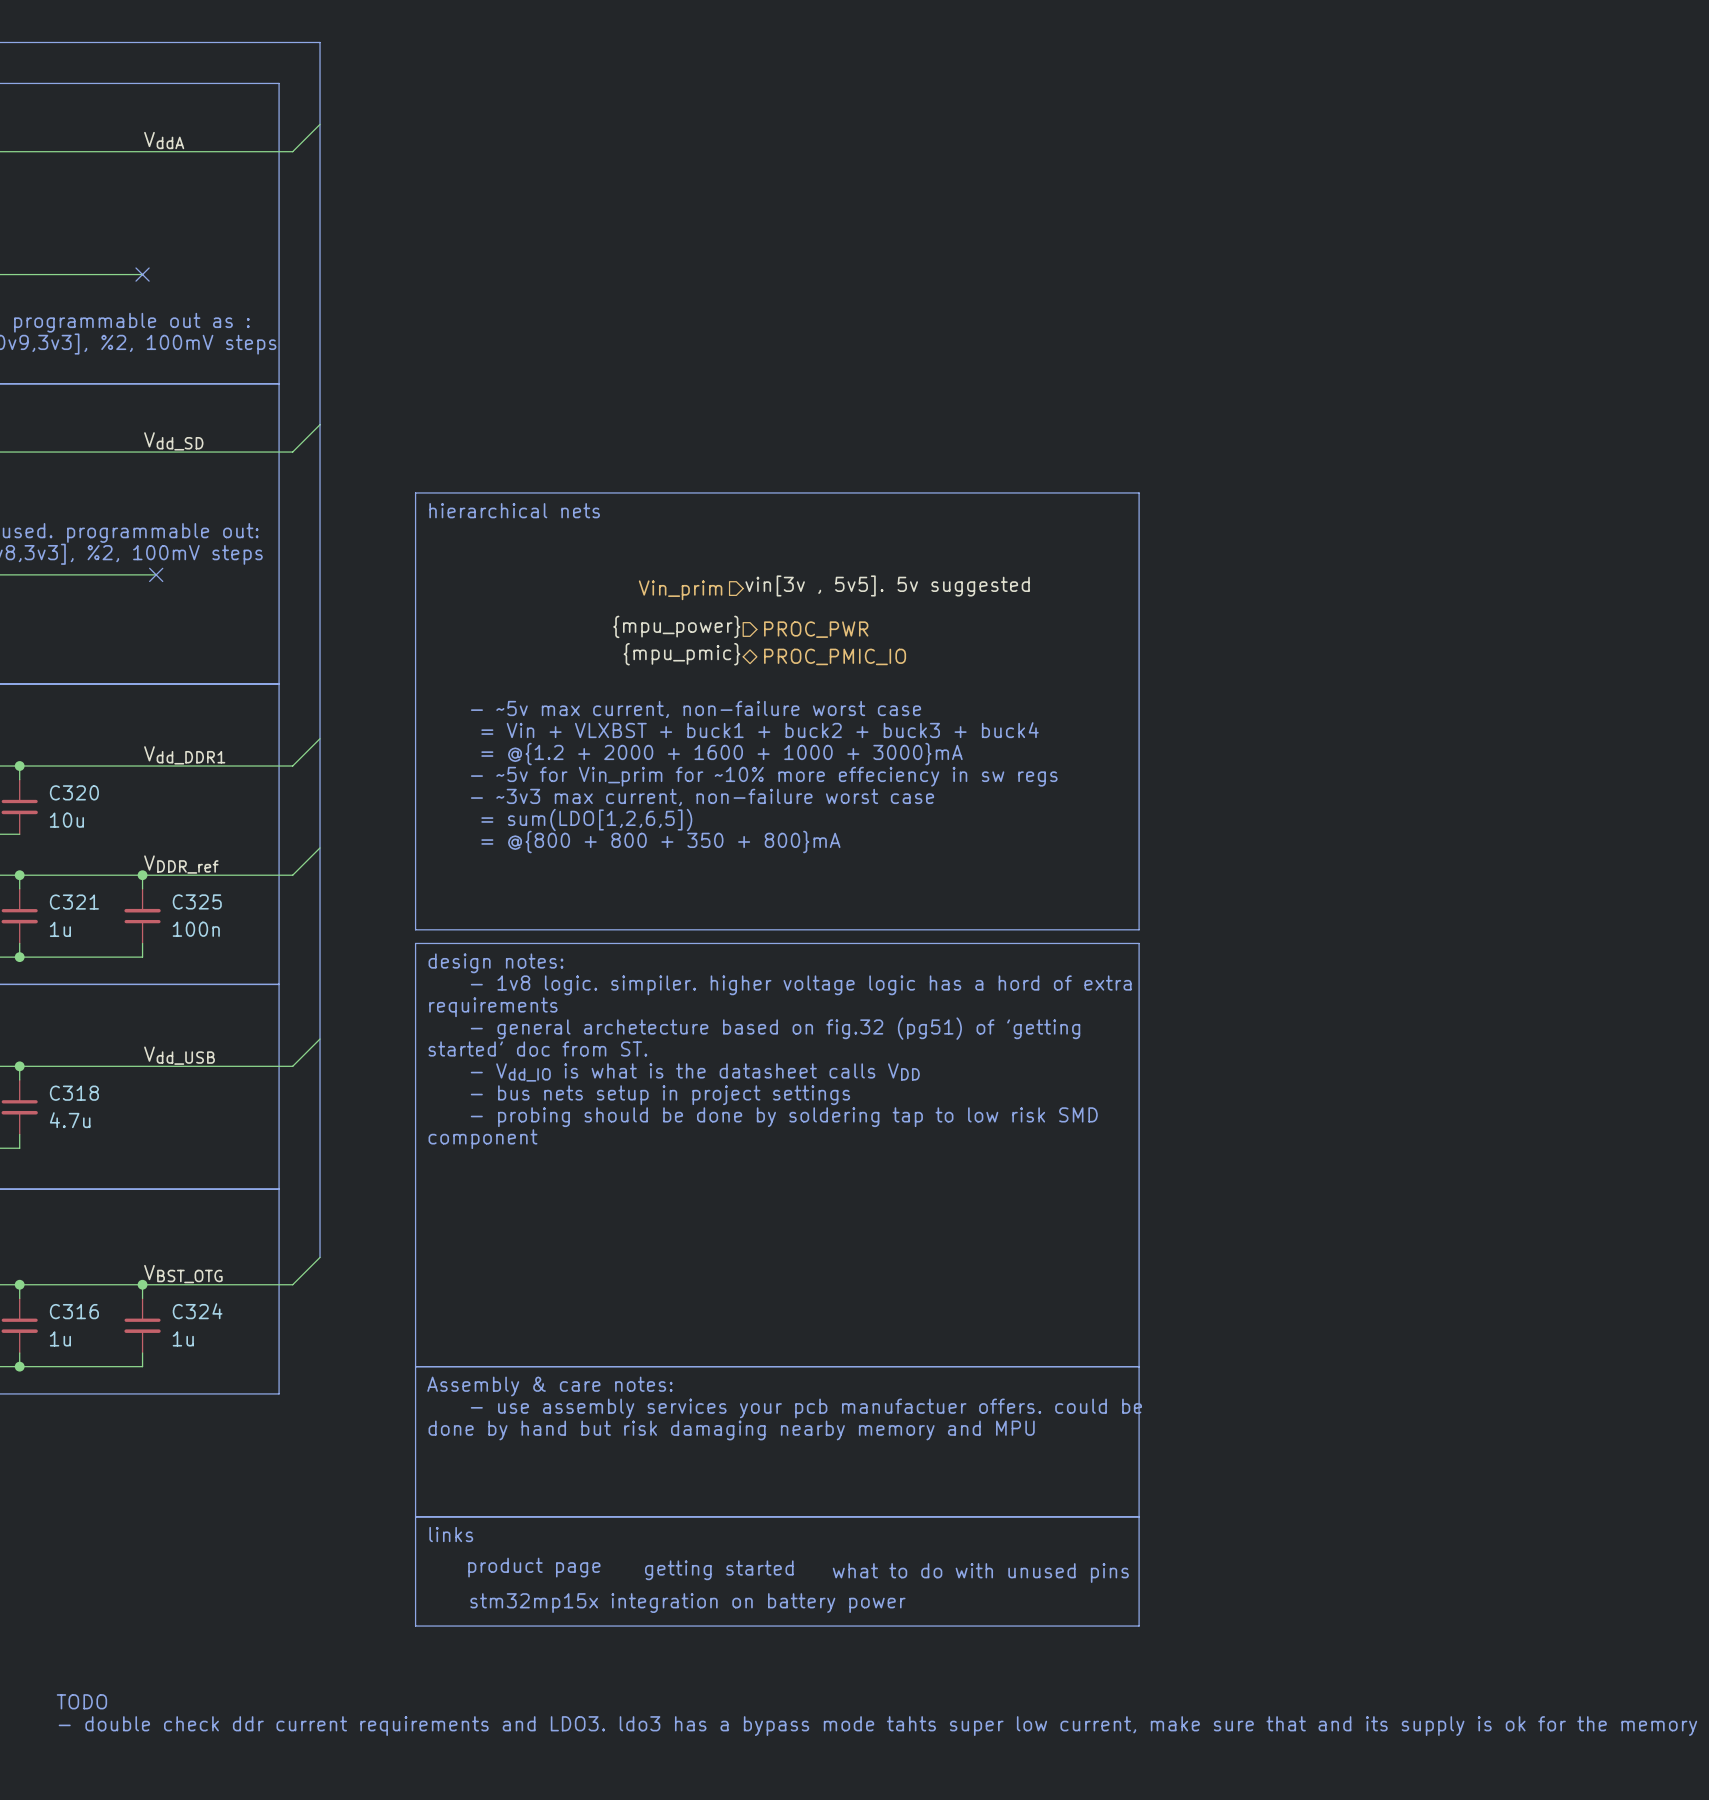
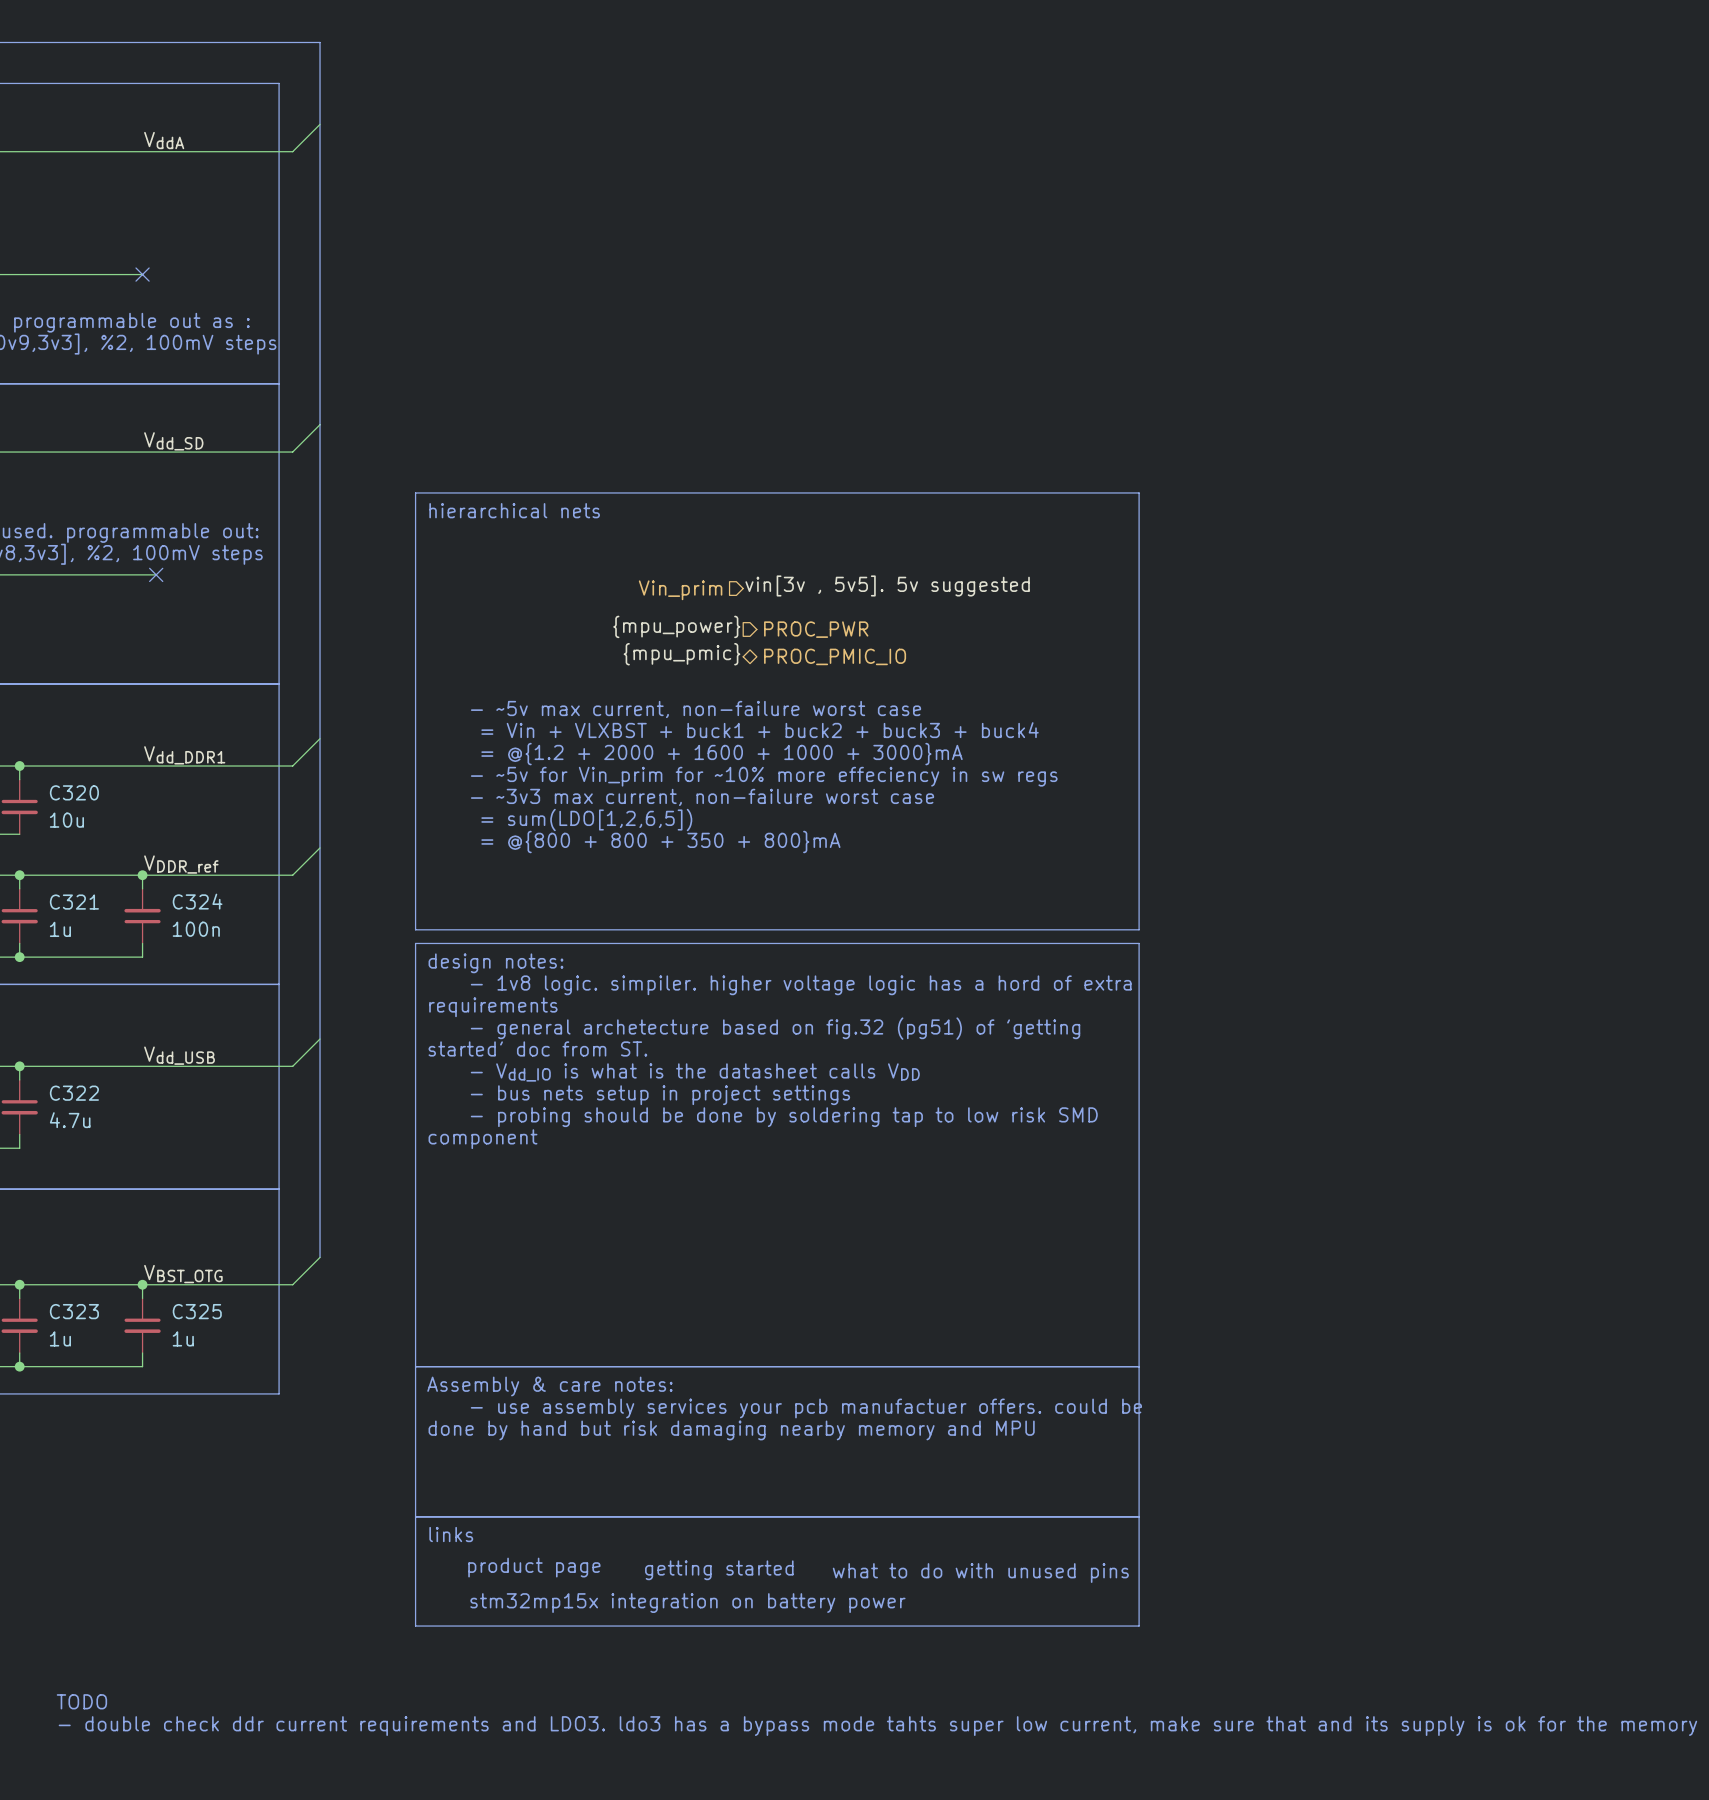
C325 name: C325 (197, 901) -> C324 (197, 901)
C318 name: C318 (74, 1093) -> C322 (74, 1093)
C316 name: C316 (74, 1311) -> C323 (74, 1311)
C324 name: C324 (197, 1311) -> C325 (197, 1311)

